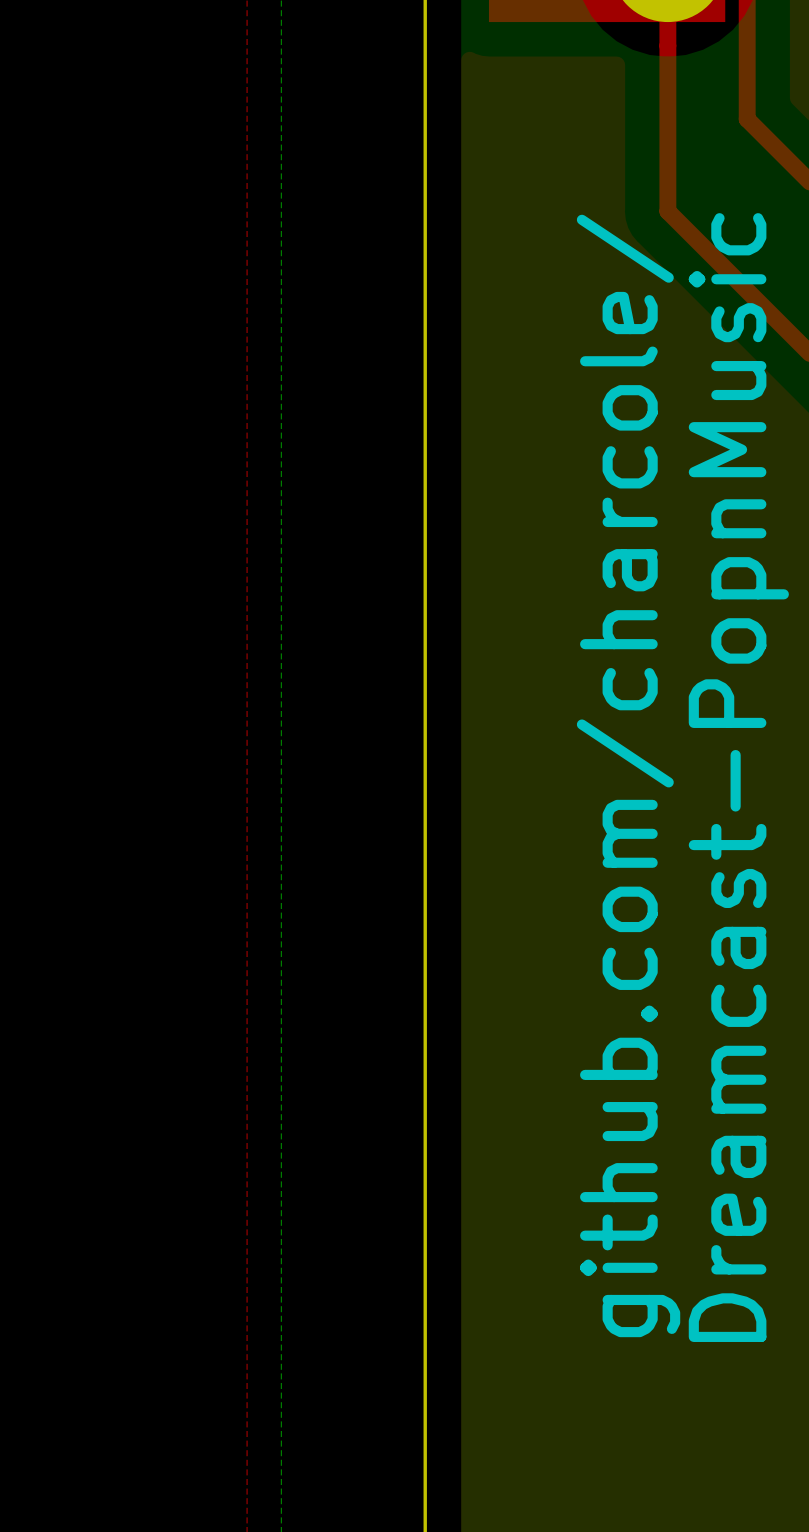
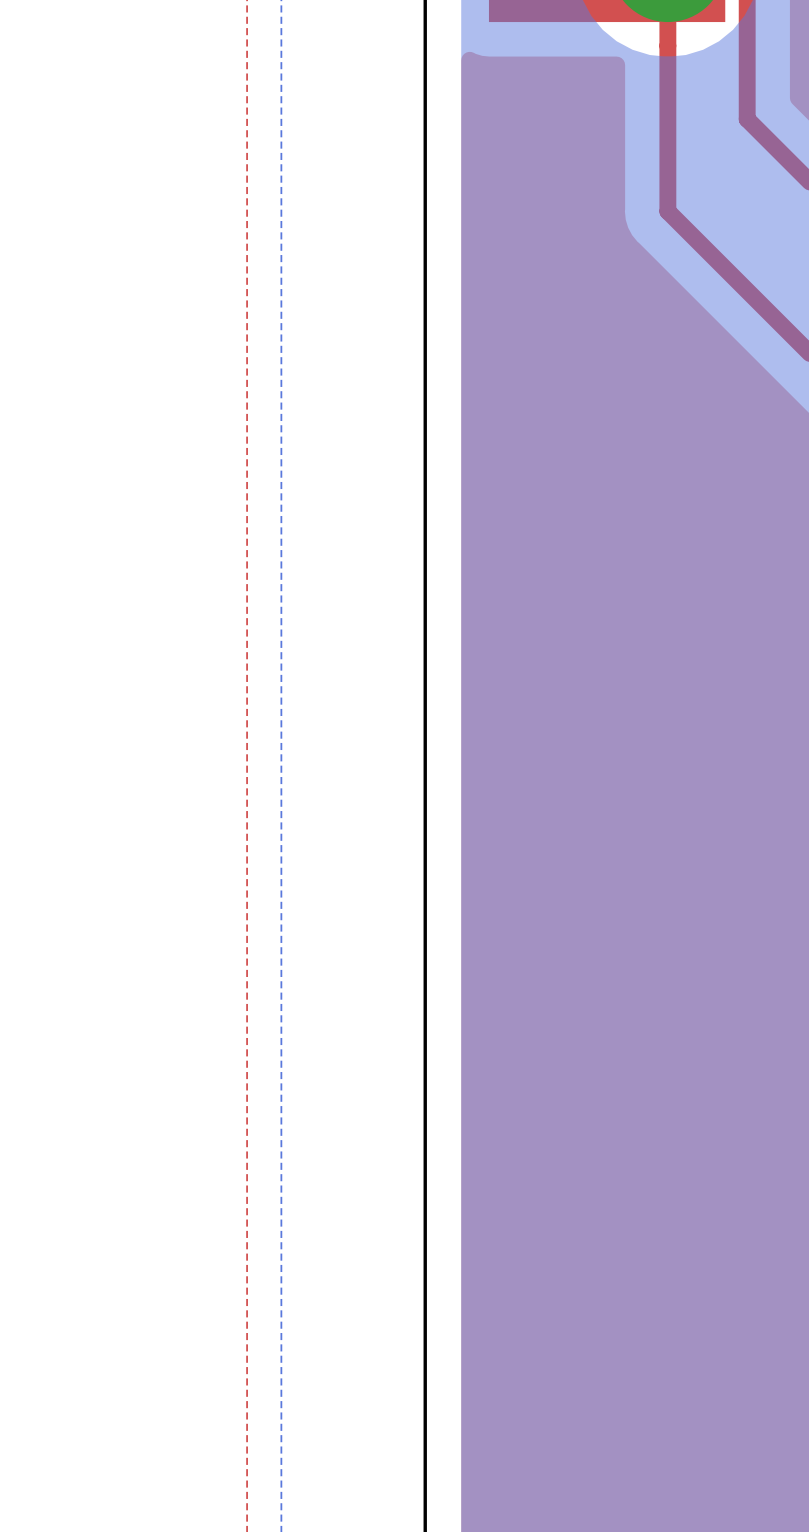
text: github.com/charcole/ (628, 775) -> none
text: Dreamcast-PopnMusic (738, 777) -> none

